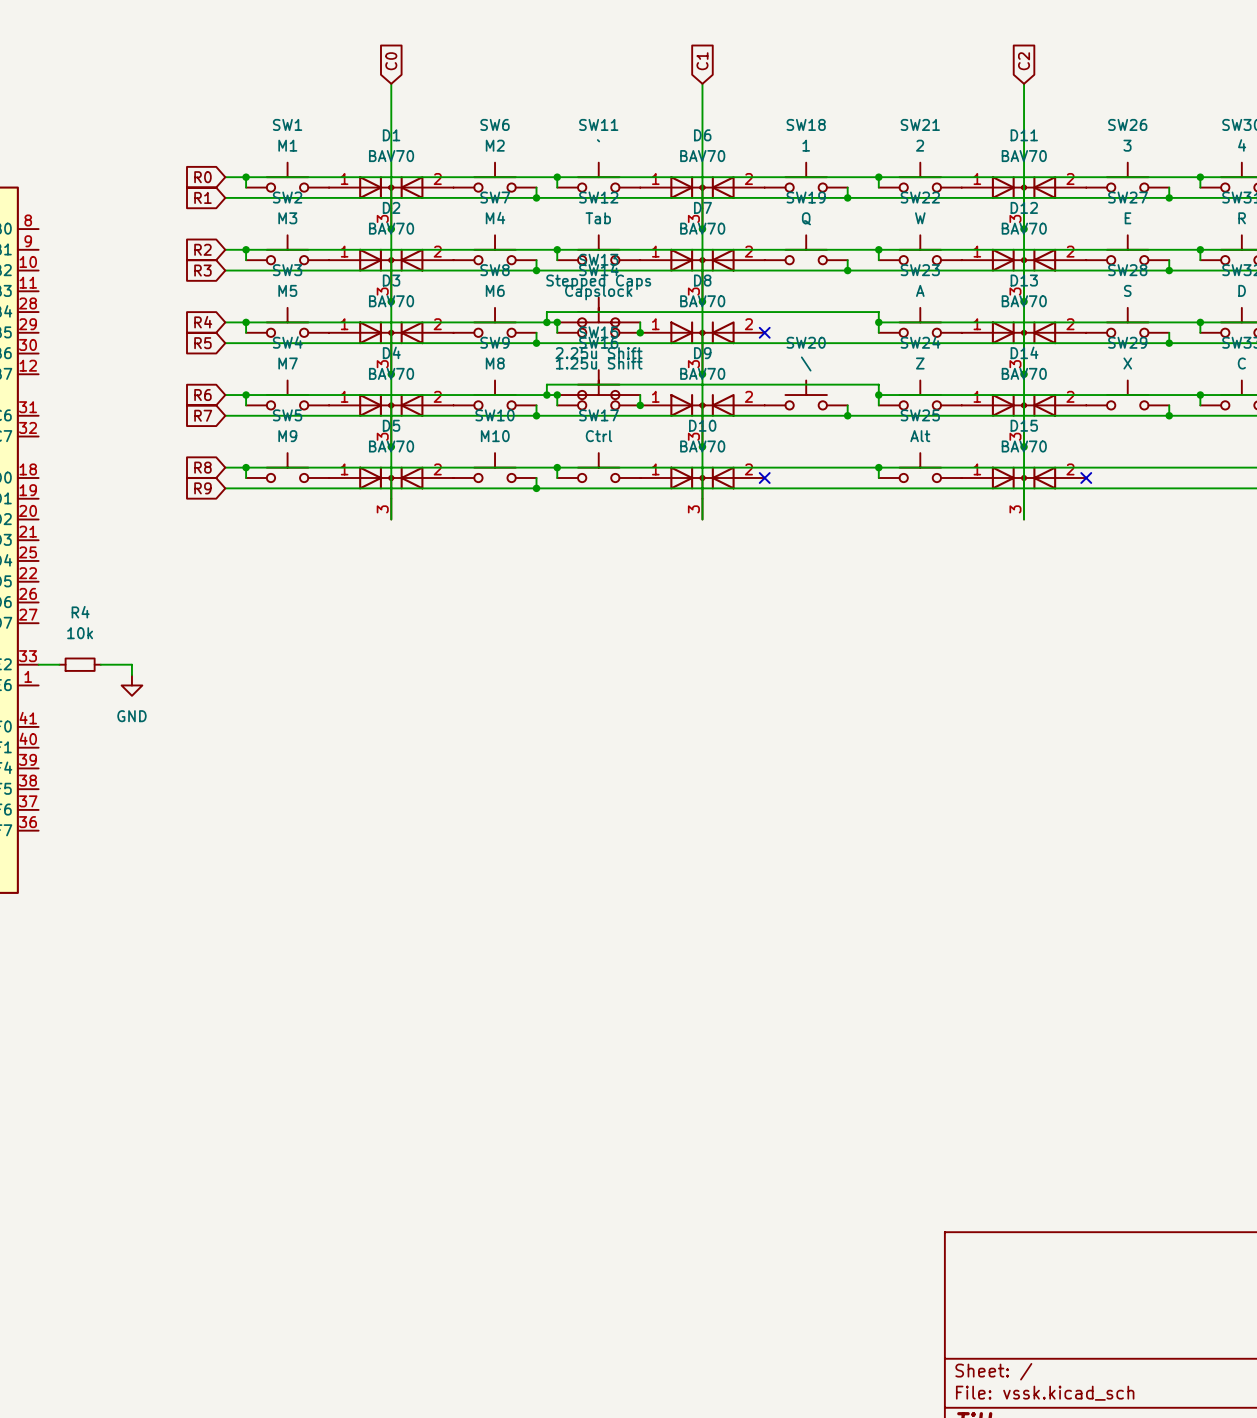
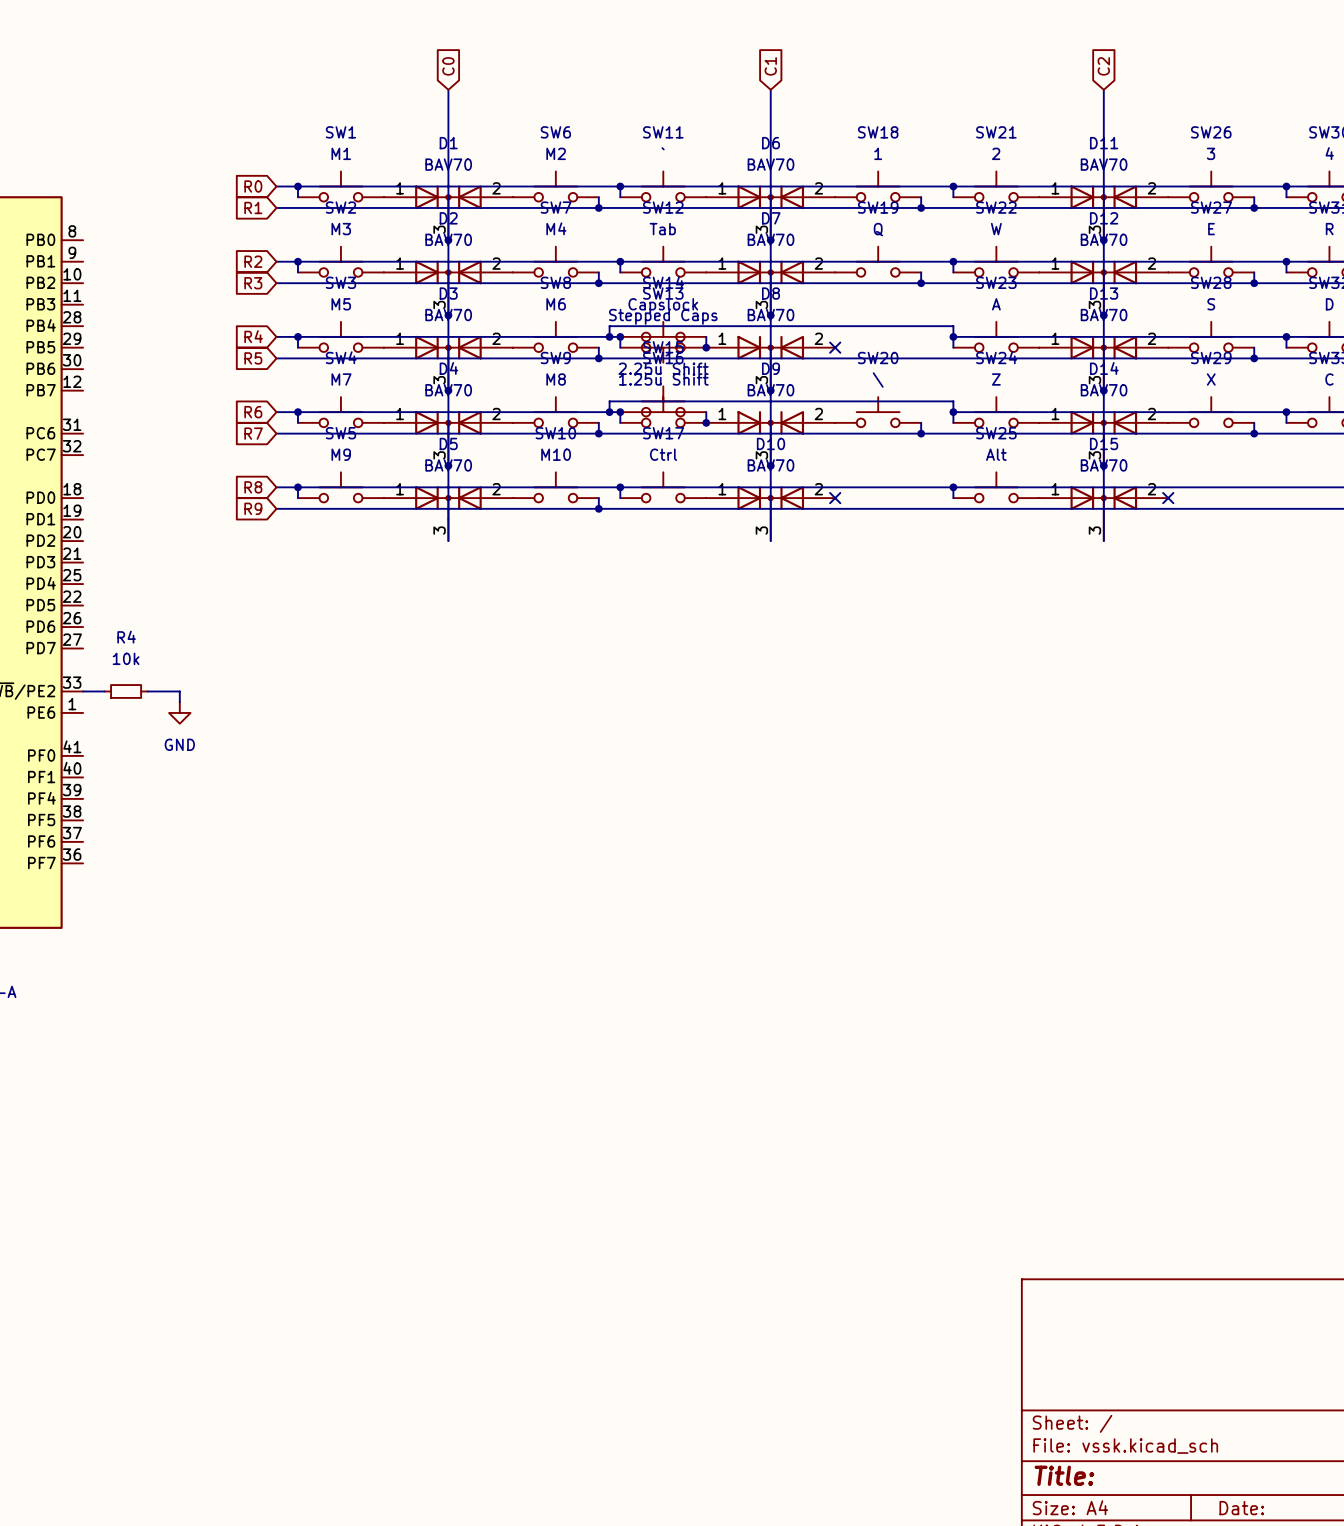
SW13 rotation: 0° (598, 312) -> 180° (663, 347)

